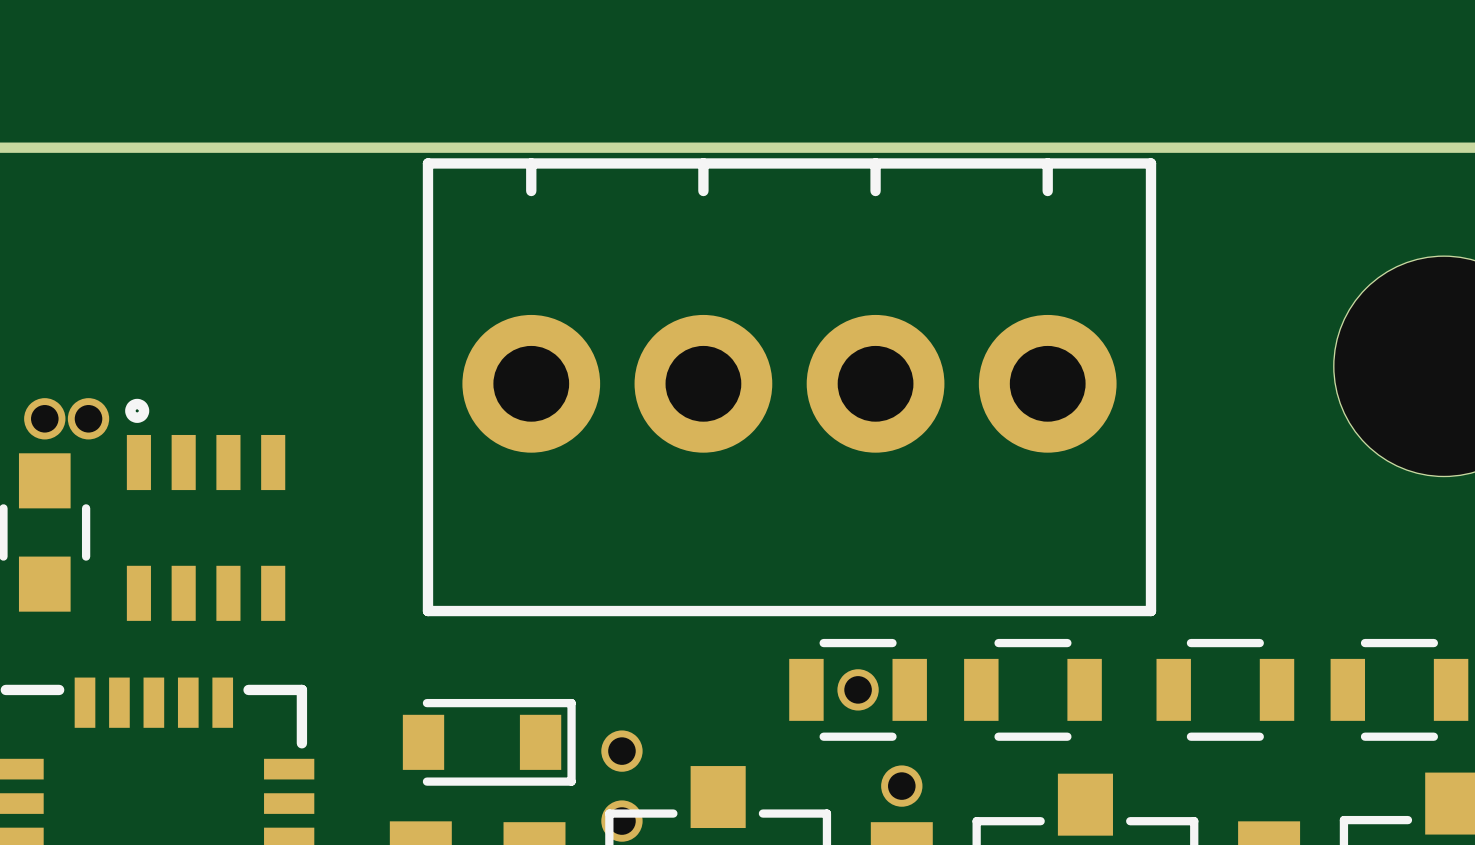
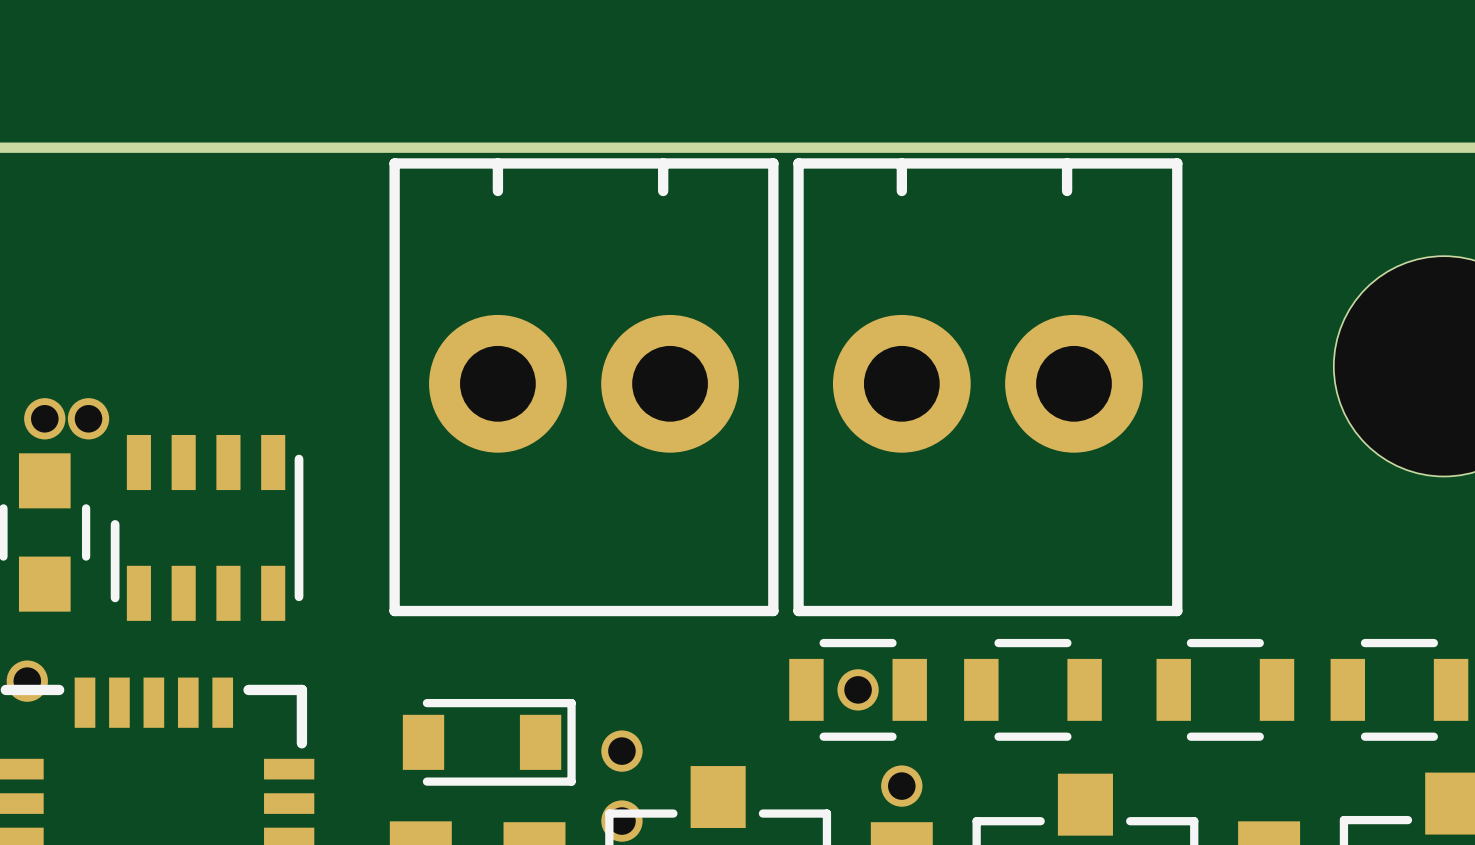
part: none -> (583, 387)
part: (789, 387) -> none
part: none -> (987, 387)
part footprint: [125, 398, 286, 621] -> [110, 434, 304, 621]
part: none -> (27, 681)

